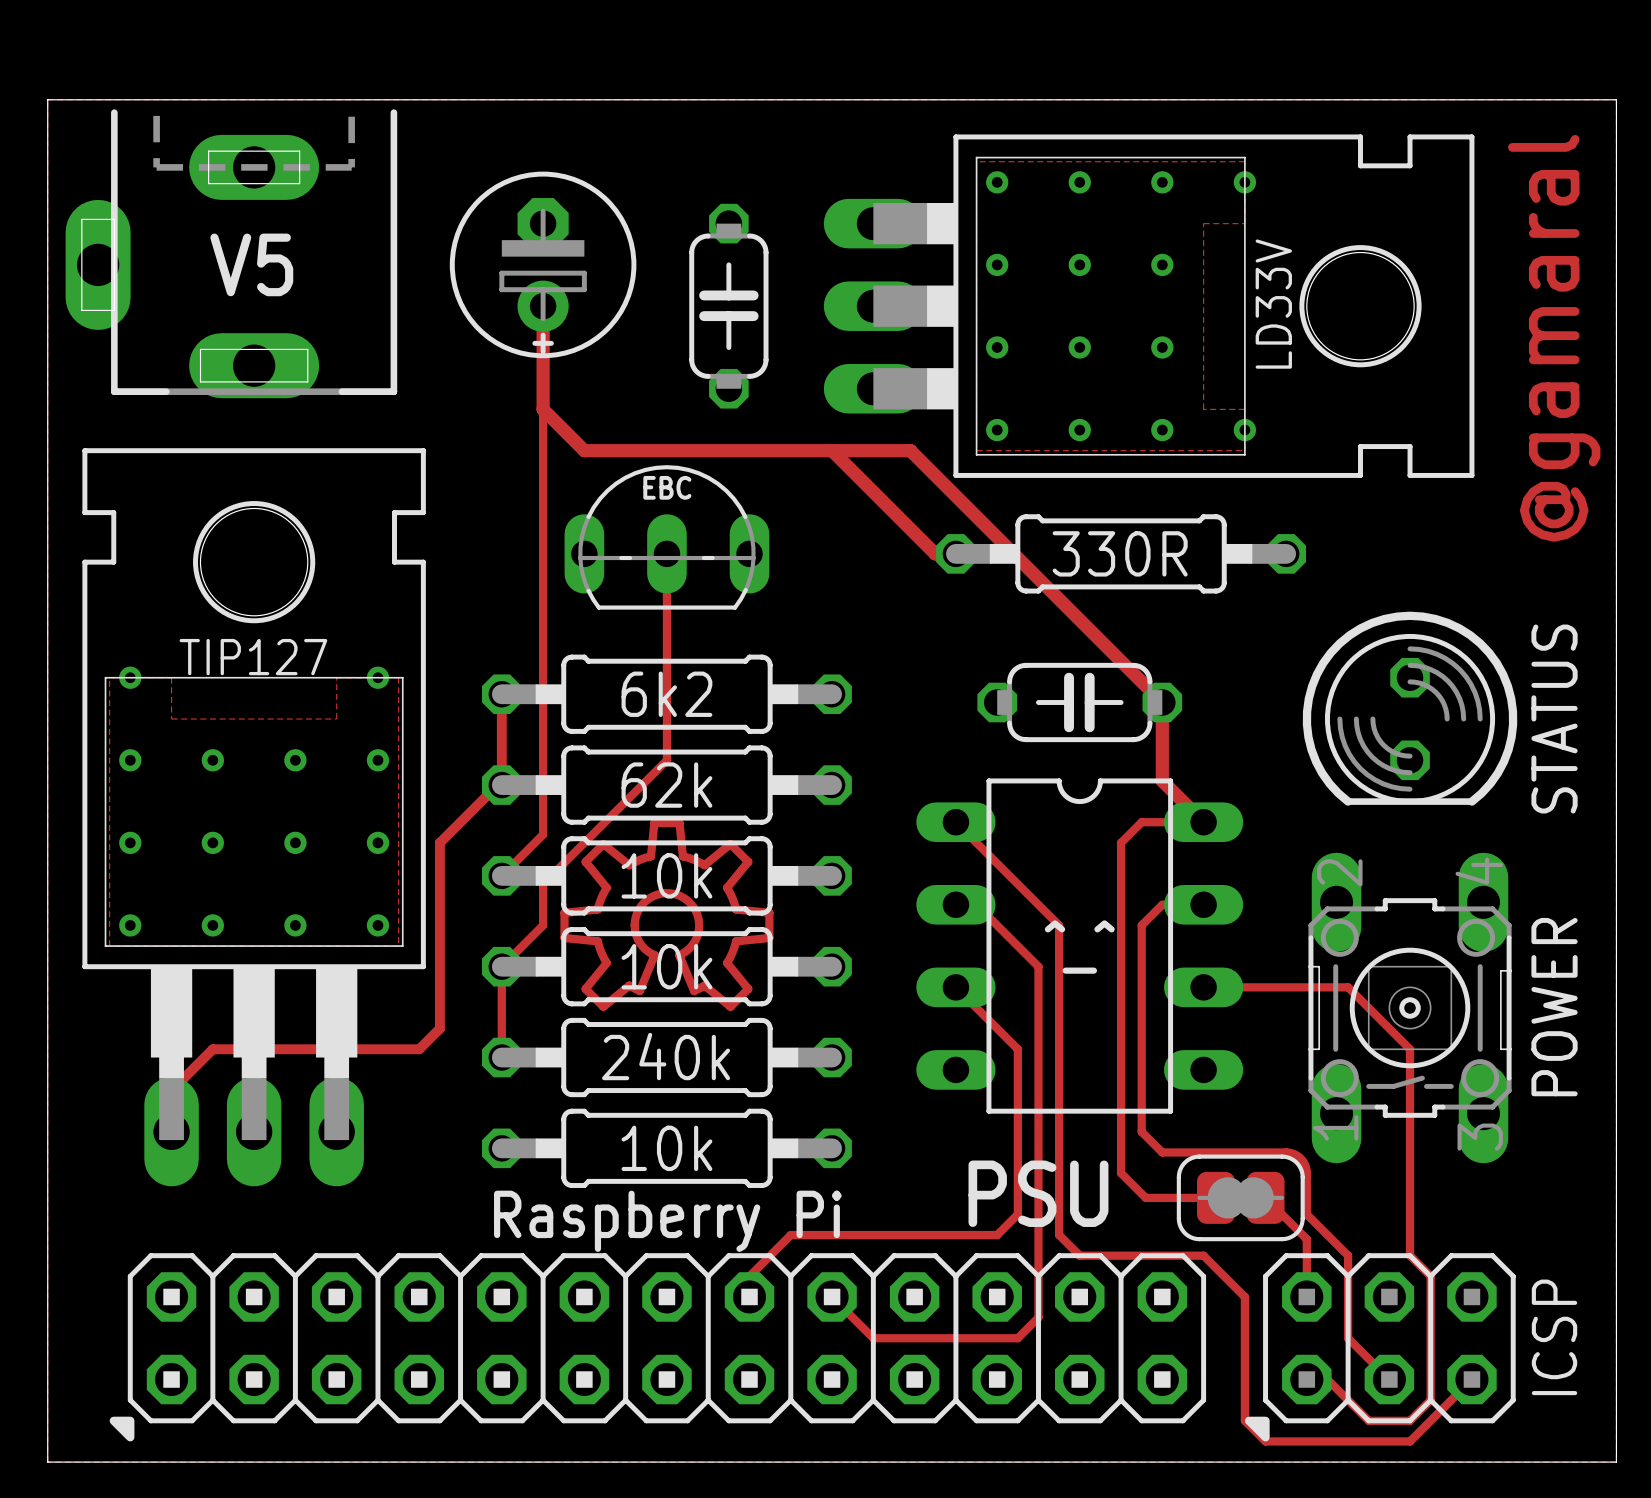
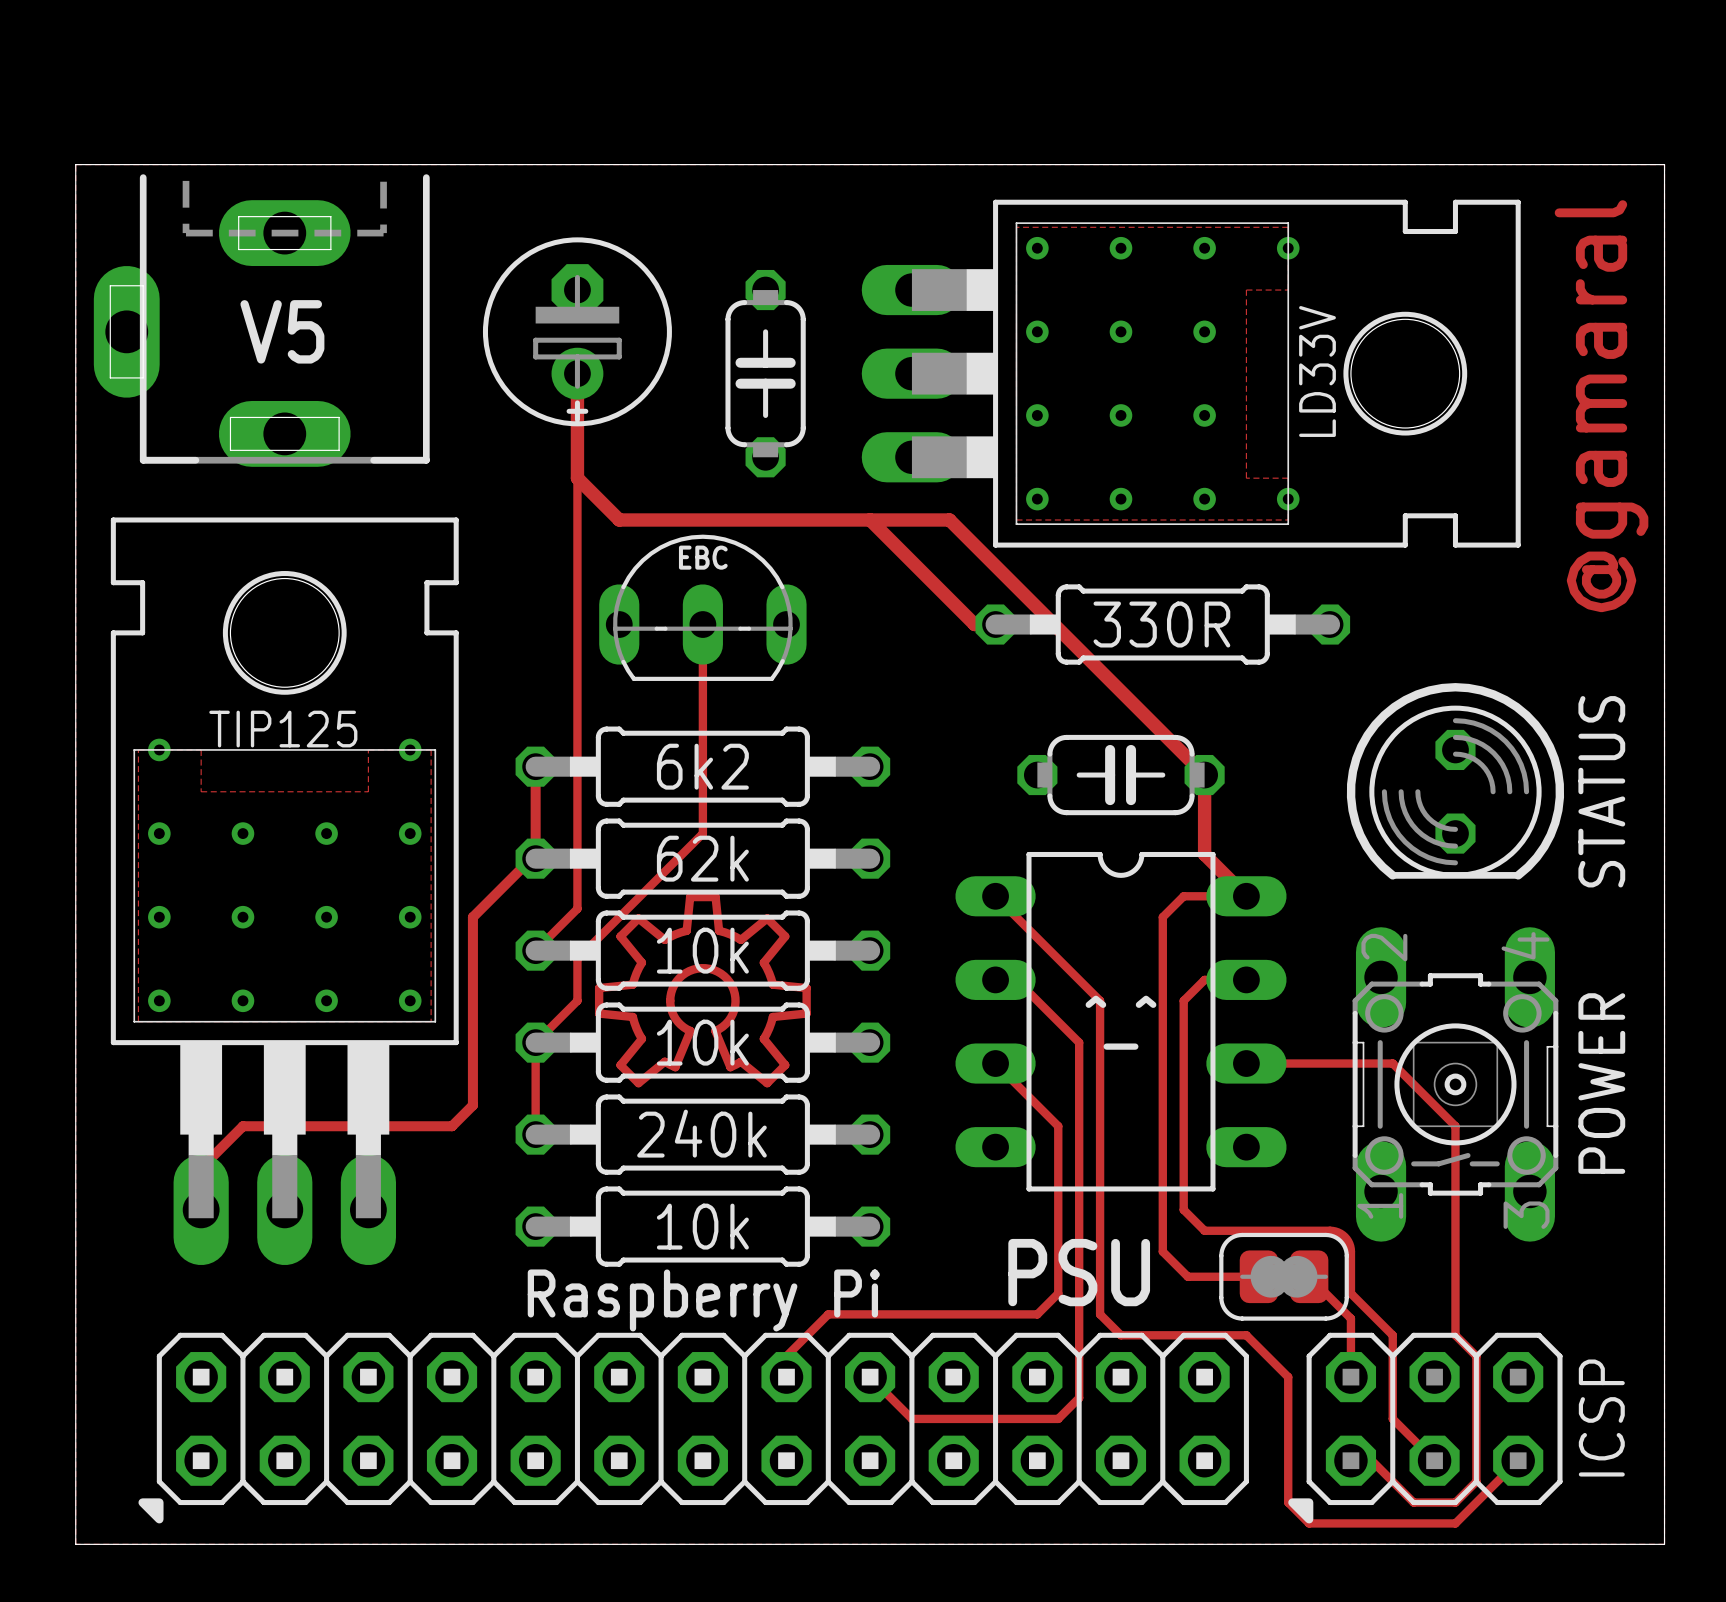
text: TIP127 (253, 657) -> TIP125 (283, 729)

